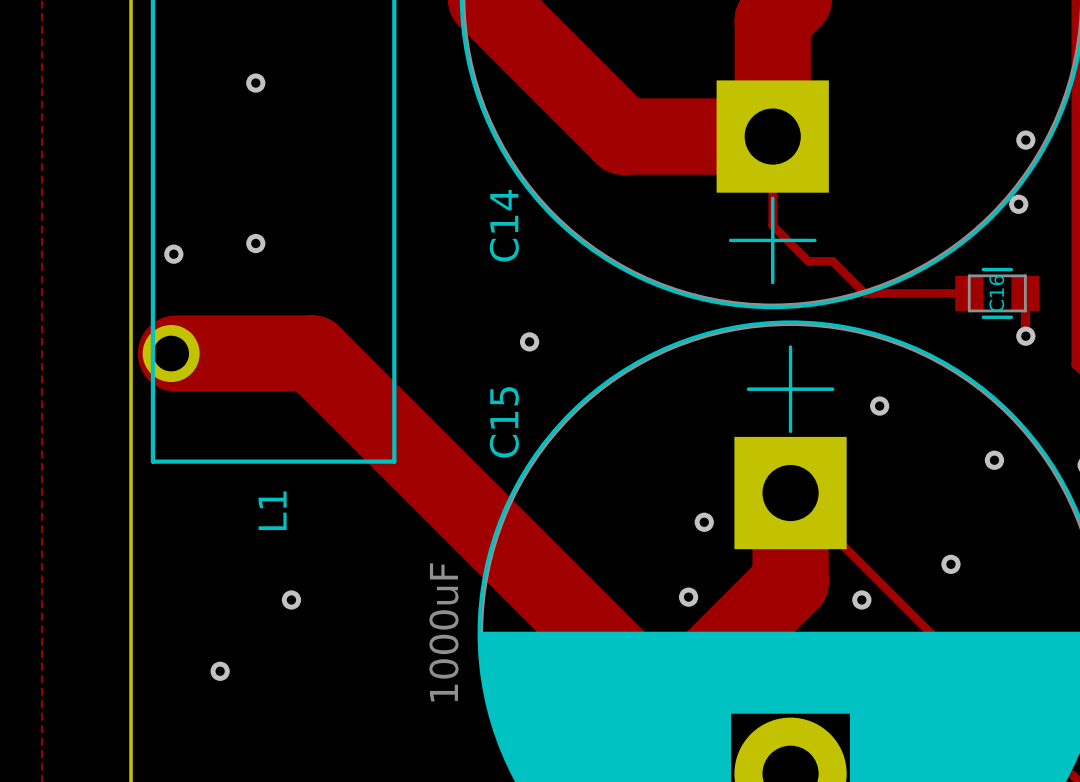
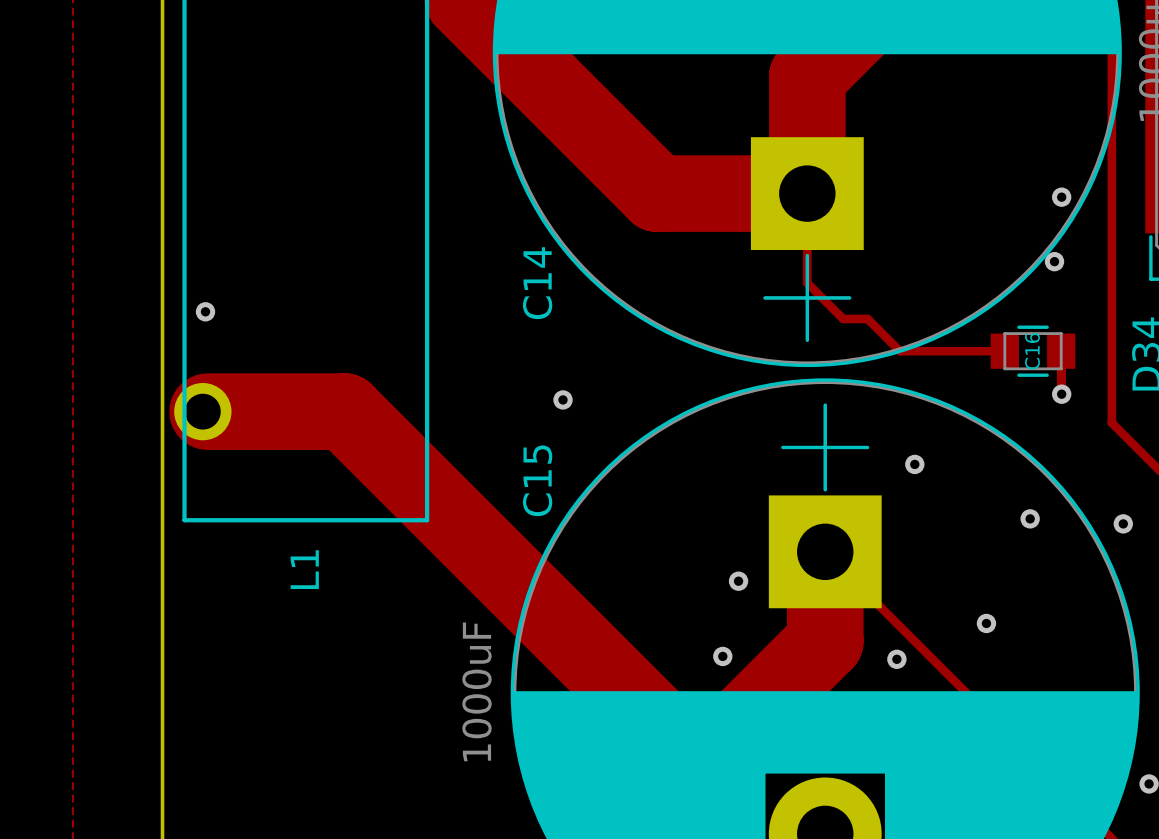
via: (255, 83) -> none
via: (255, 243) -> none
via: (291, 599) -> none
via: (220, 671) -> none

